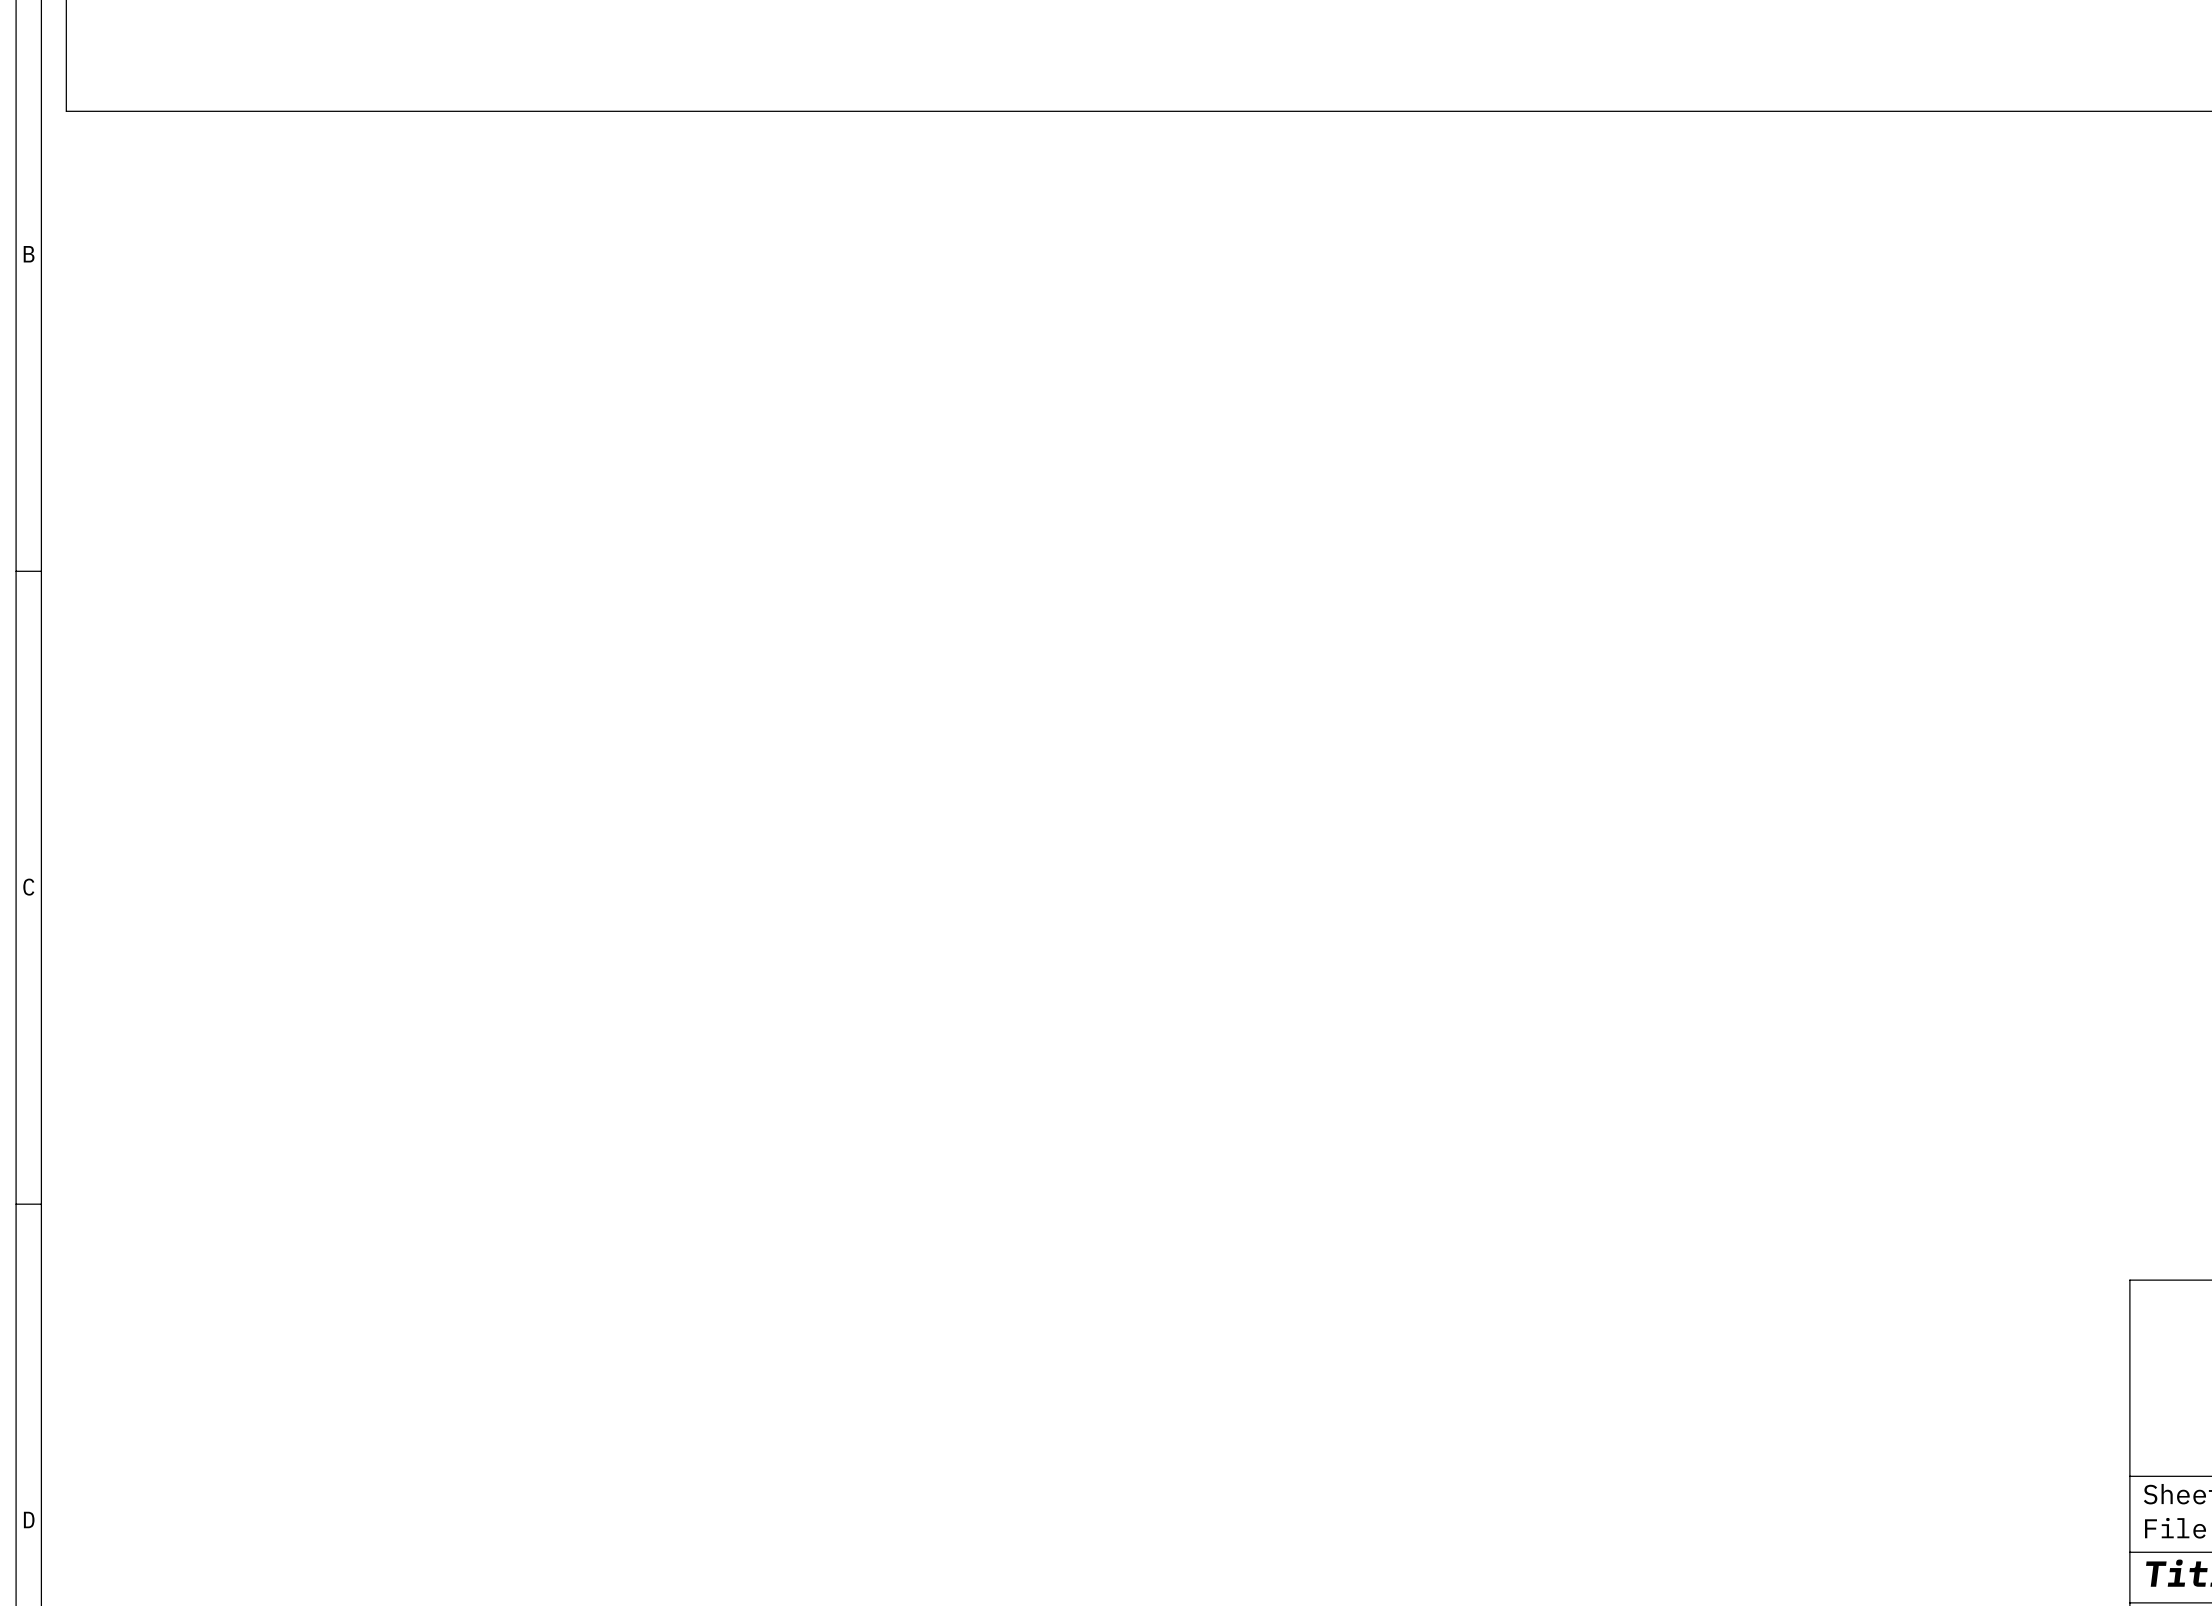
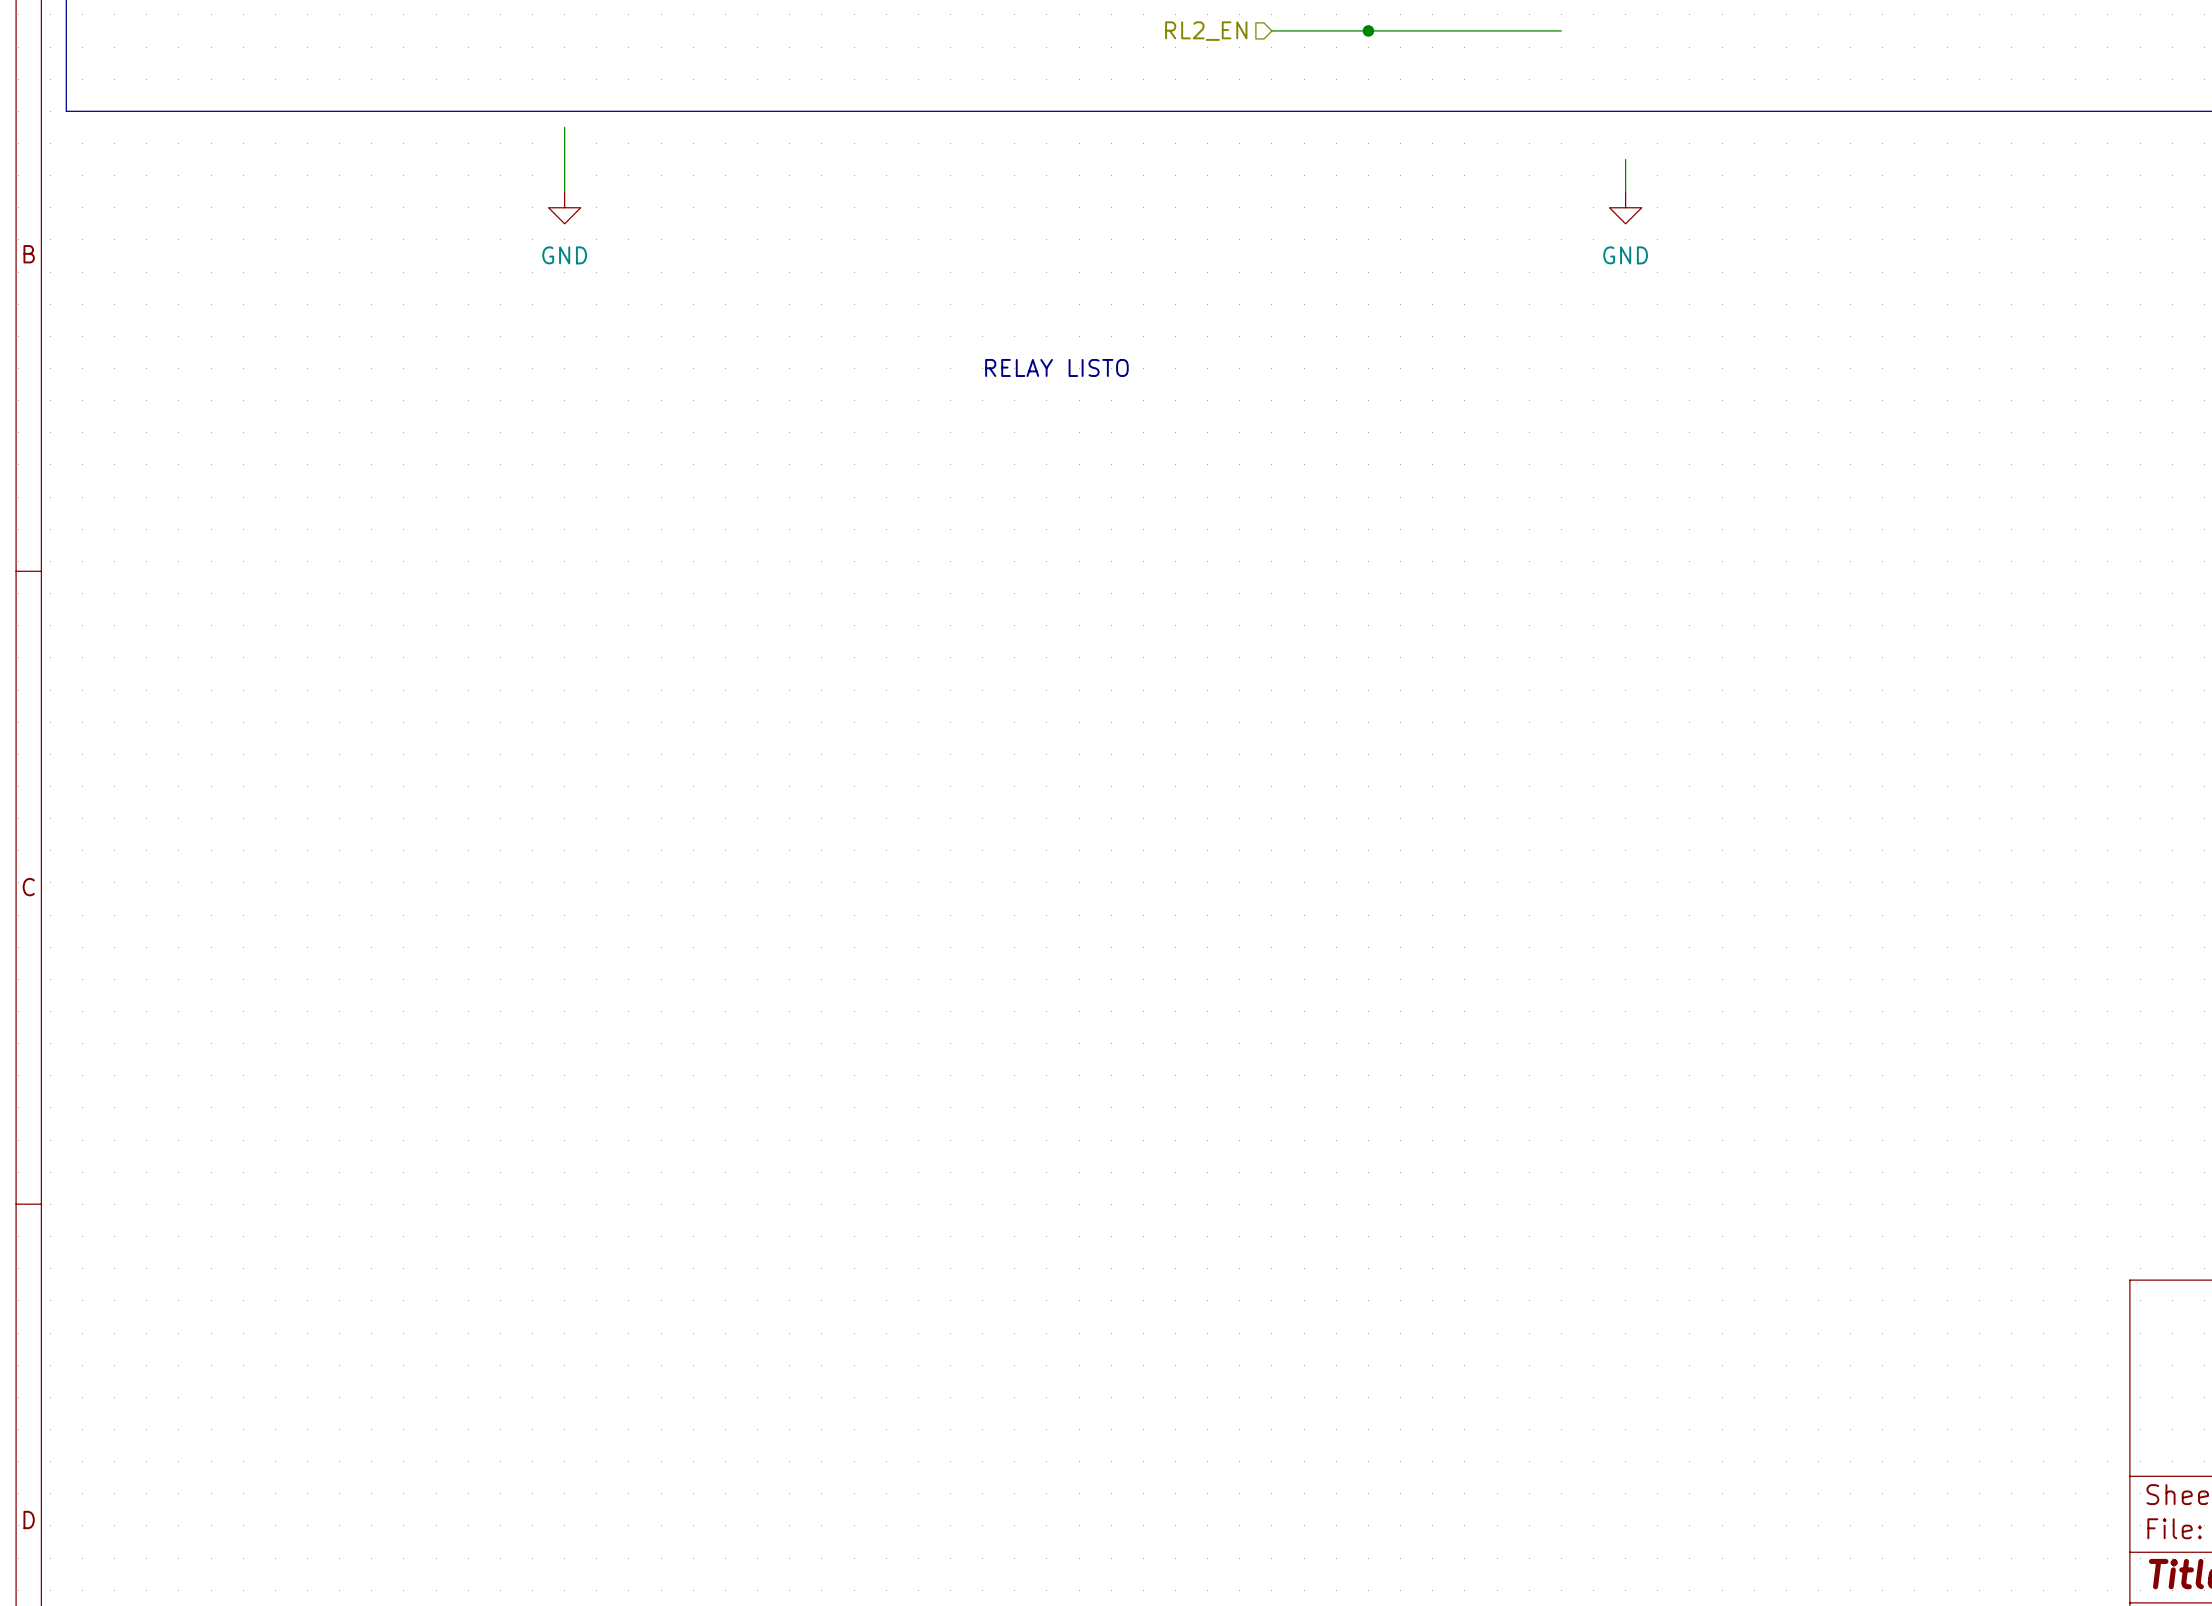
wire: none -> (1271, 30) (1561, 30)
junction: none -> (1368, 30)
hierarchical label: none -> RL2_EN (1206, 31)
wire: none -> (564, 127) (564, 191)
wire: none -> (1625, 159) (1625, 191)
power symbol: none -> GND (564, 207)
power symbol: none -> GND (1625, 207)
text: none -> RELAY LISTO (1056, 367)

